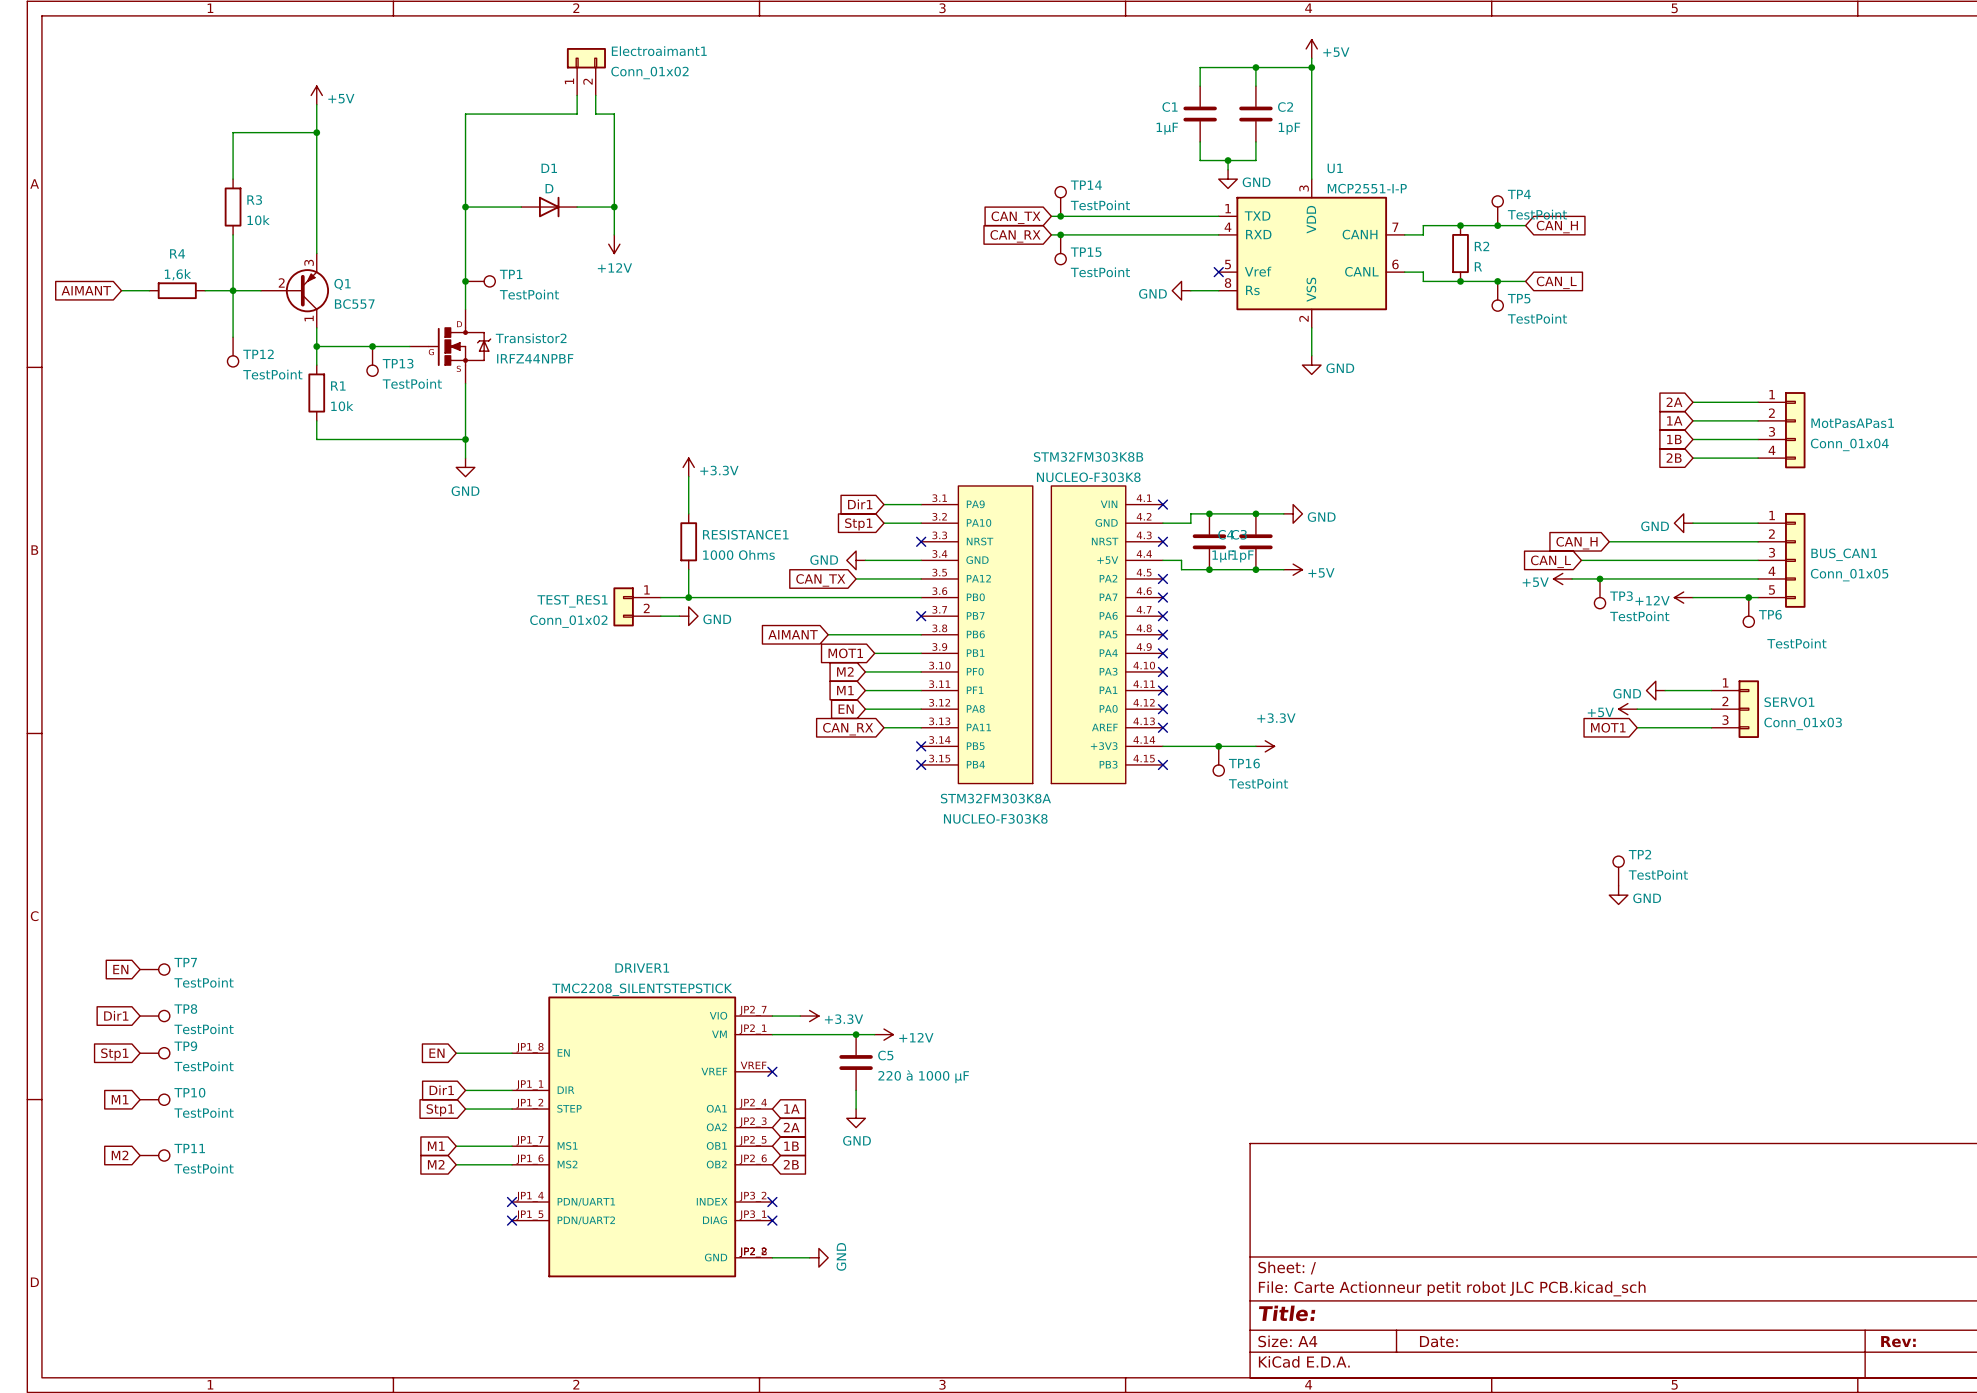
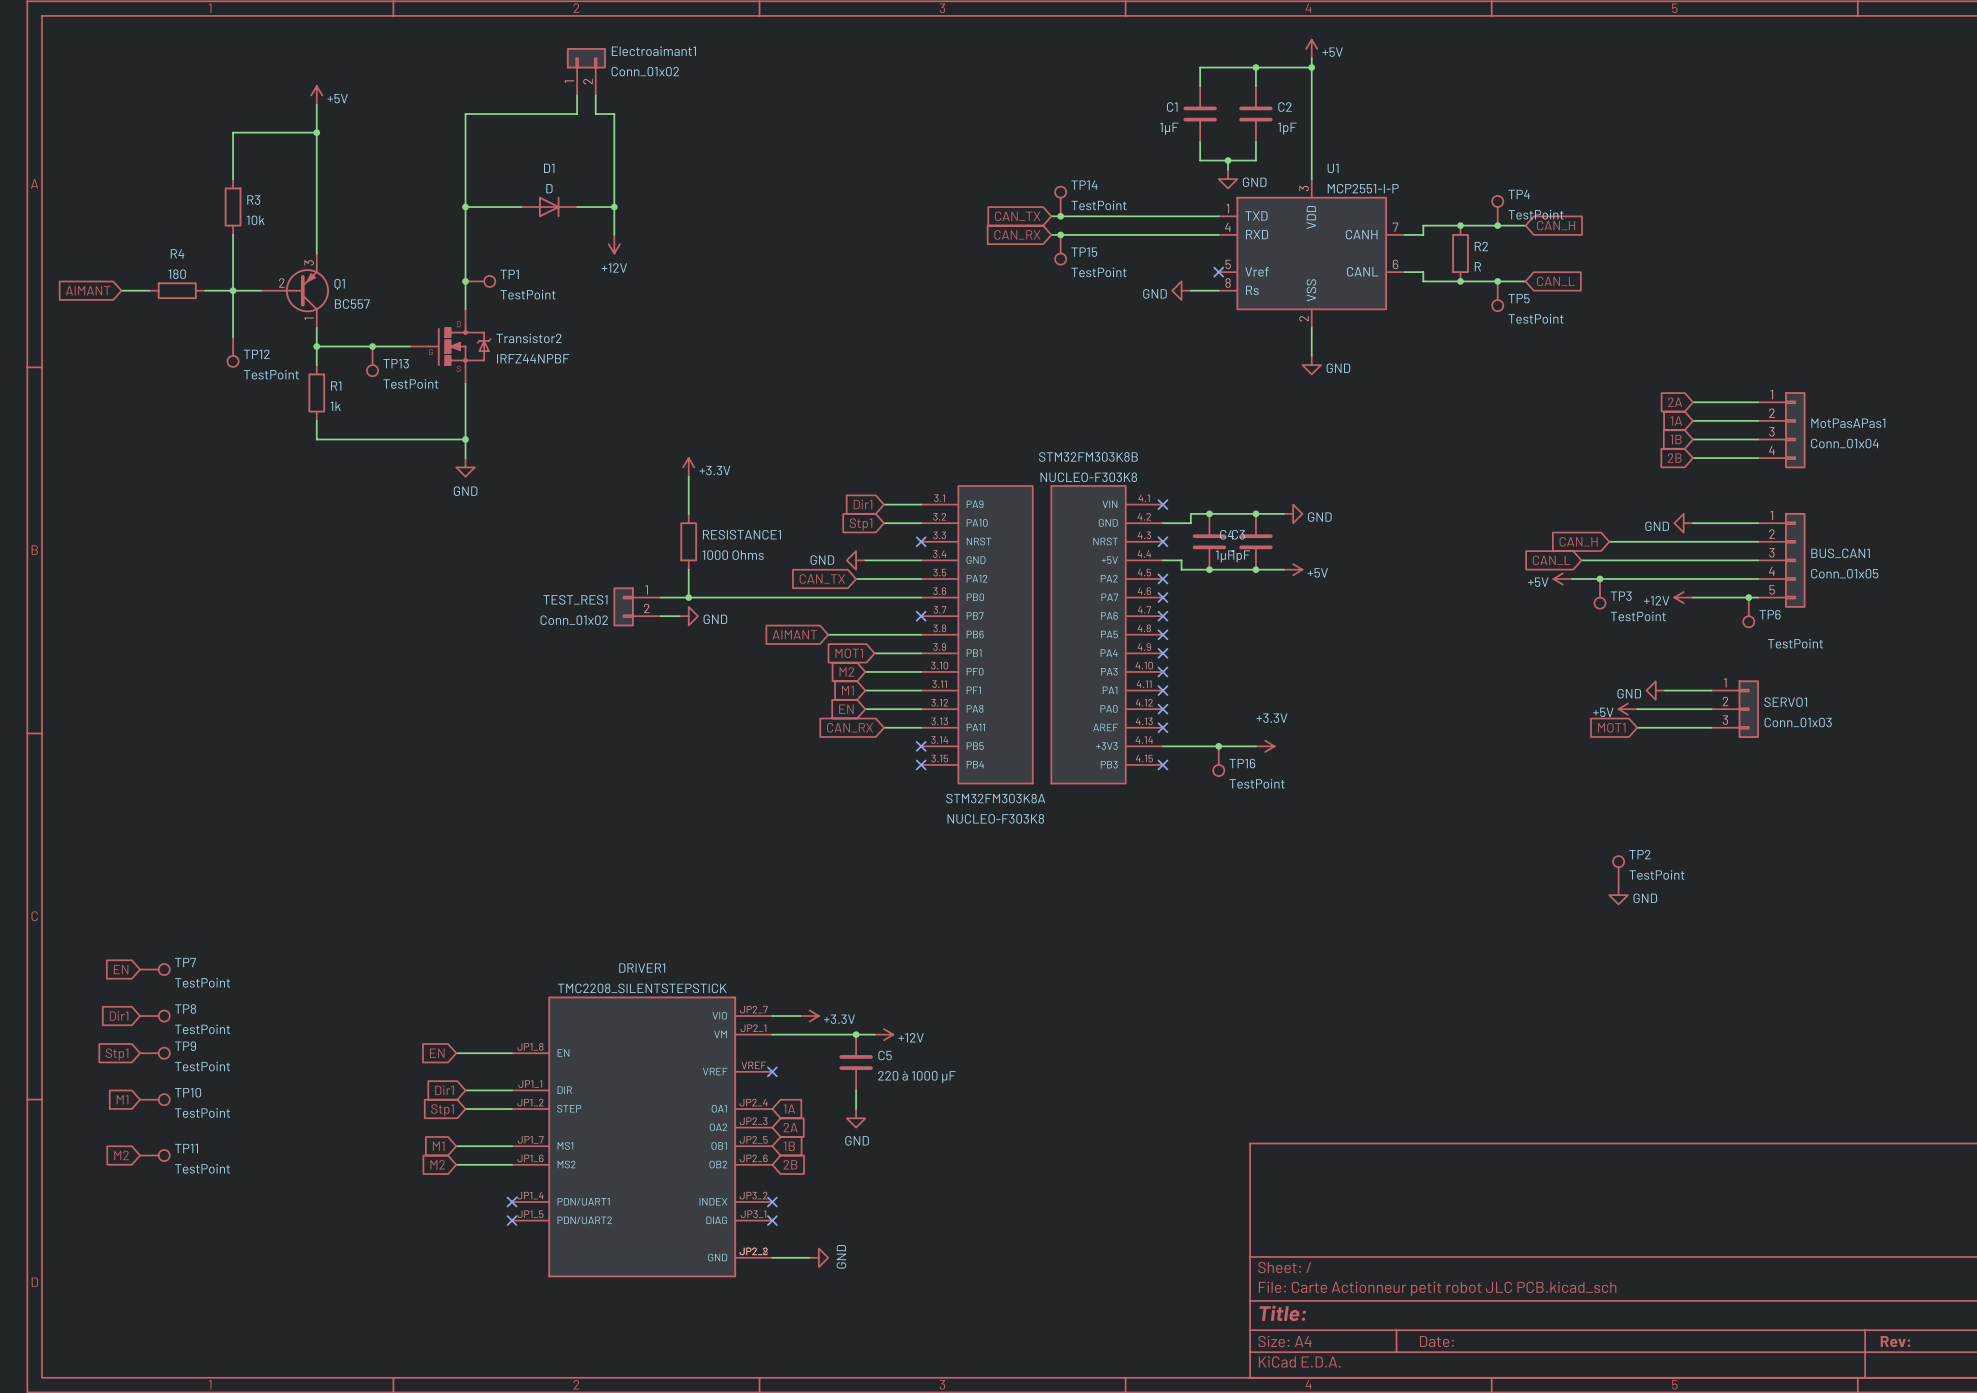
R4 value: 1,6k (177, 274) -> 180 (177, 274)
R1 value: 10k (342, 406) -> 1k (335, 406)

